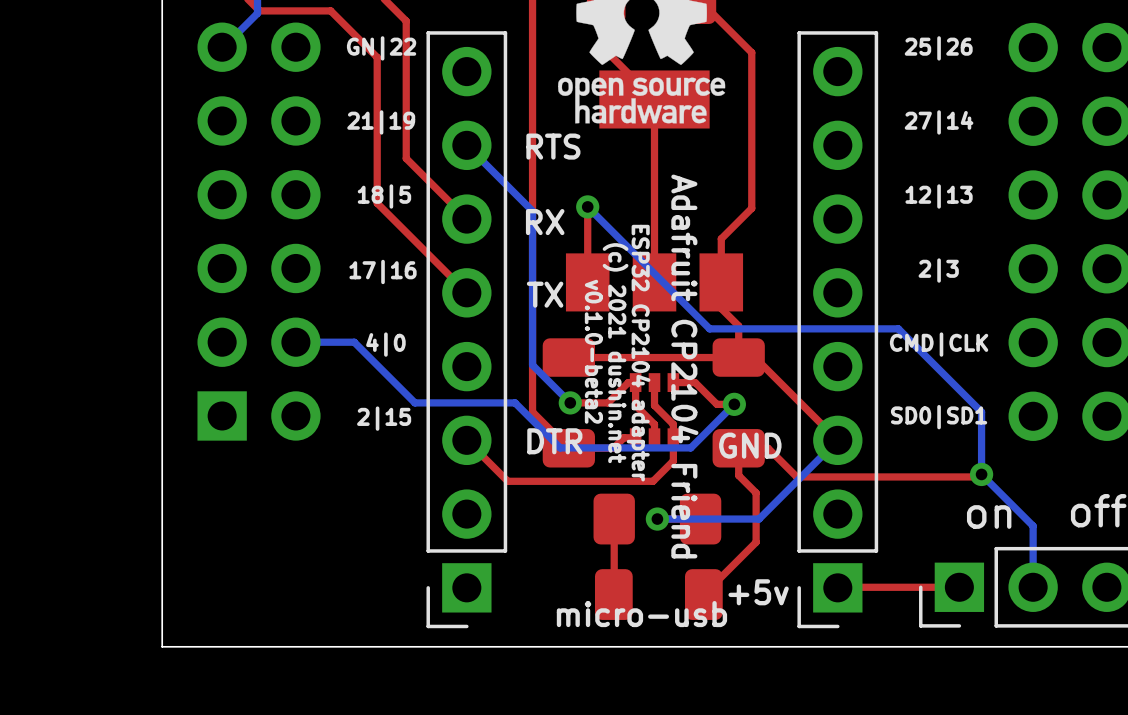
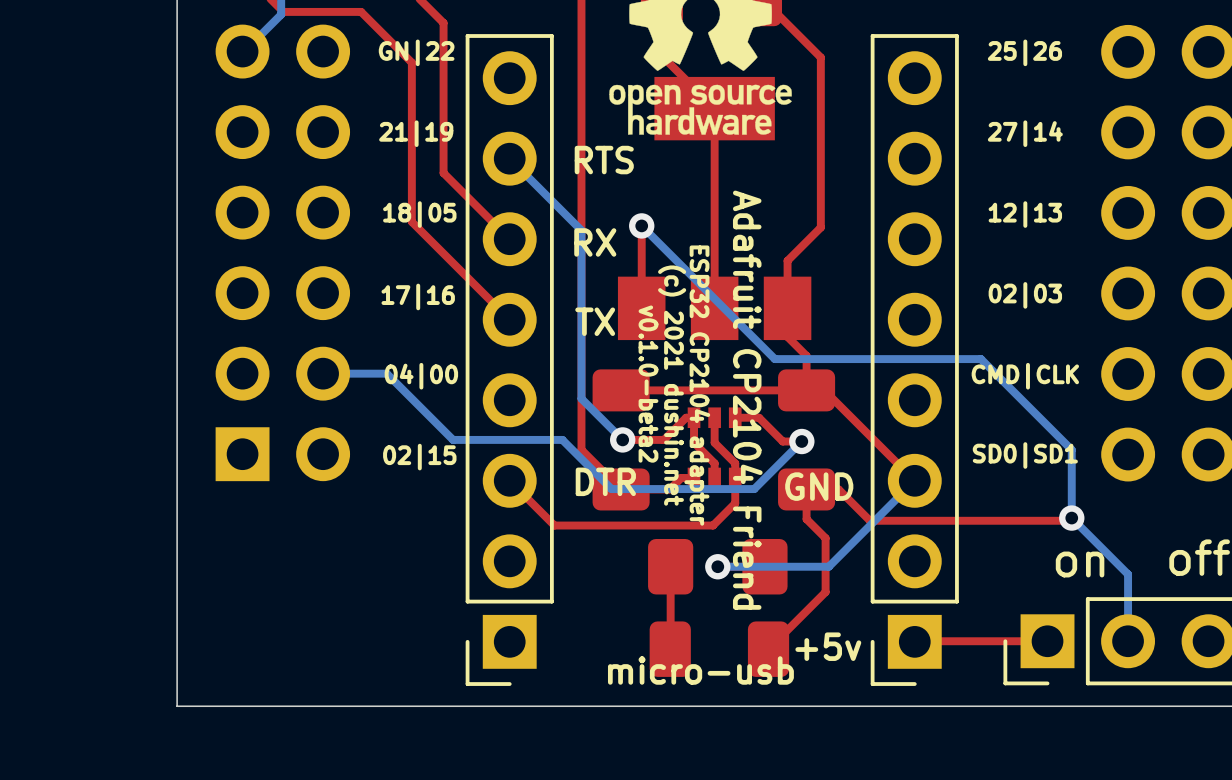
text: 18|5 (384, 196) -> 18|05 (419, 214)
text: 2|3 (938, 270) -> 02|03 (1025, 295)
text: 4|0 (385, 344) -> 04|00 (421, 376)
text: 2|15 (384, 418) -> 02|15 (419, 457)

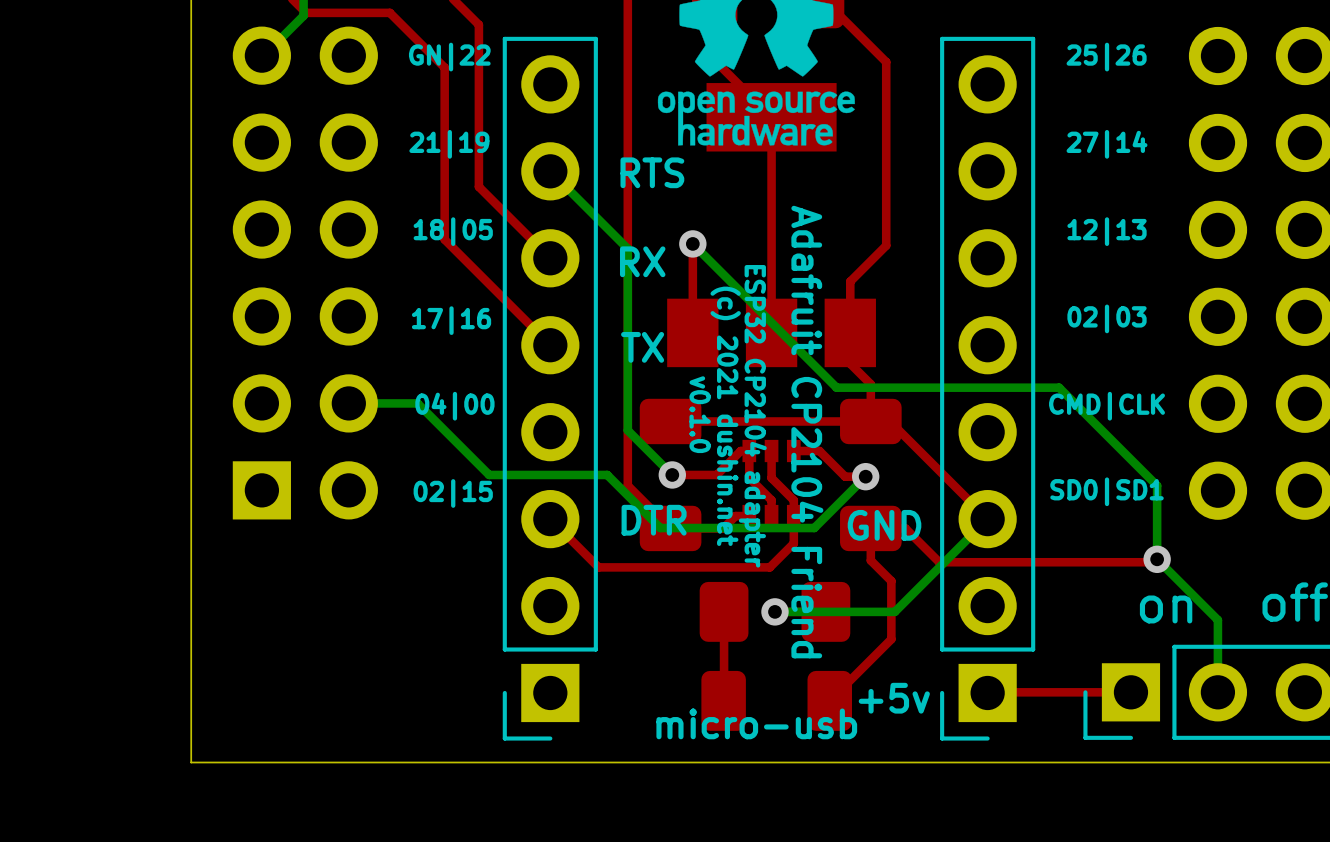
text: v0.1.0-beta2 (648, 384) -> v0.1.0 (700, 414)

